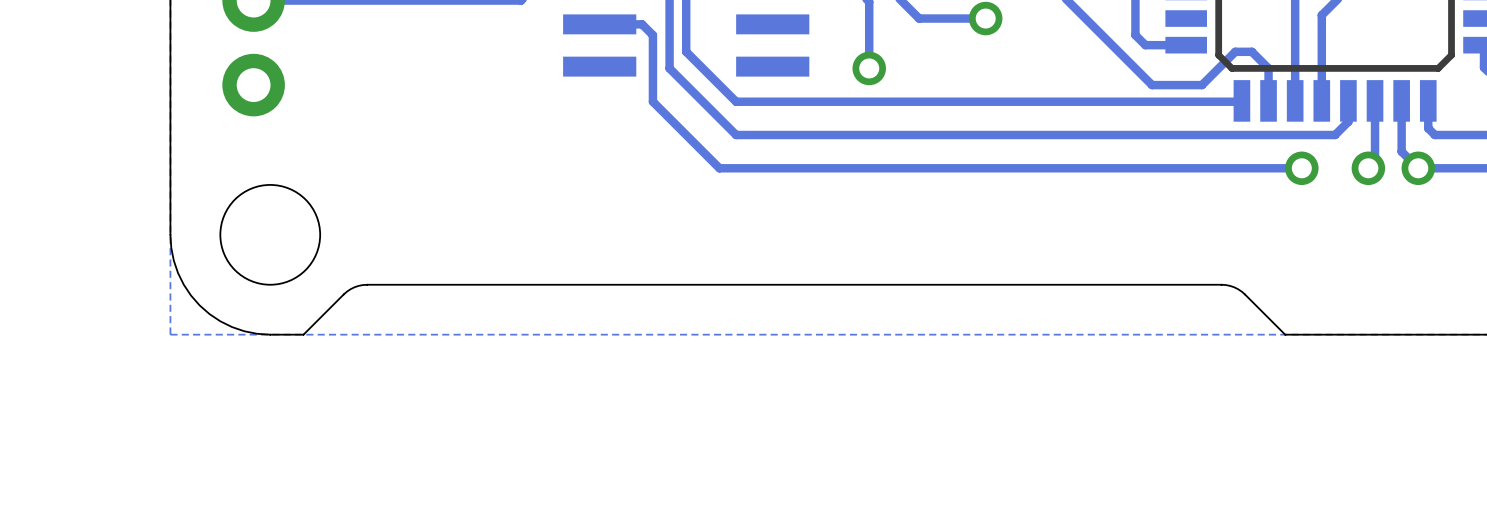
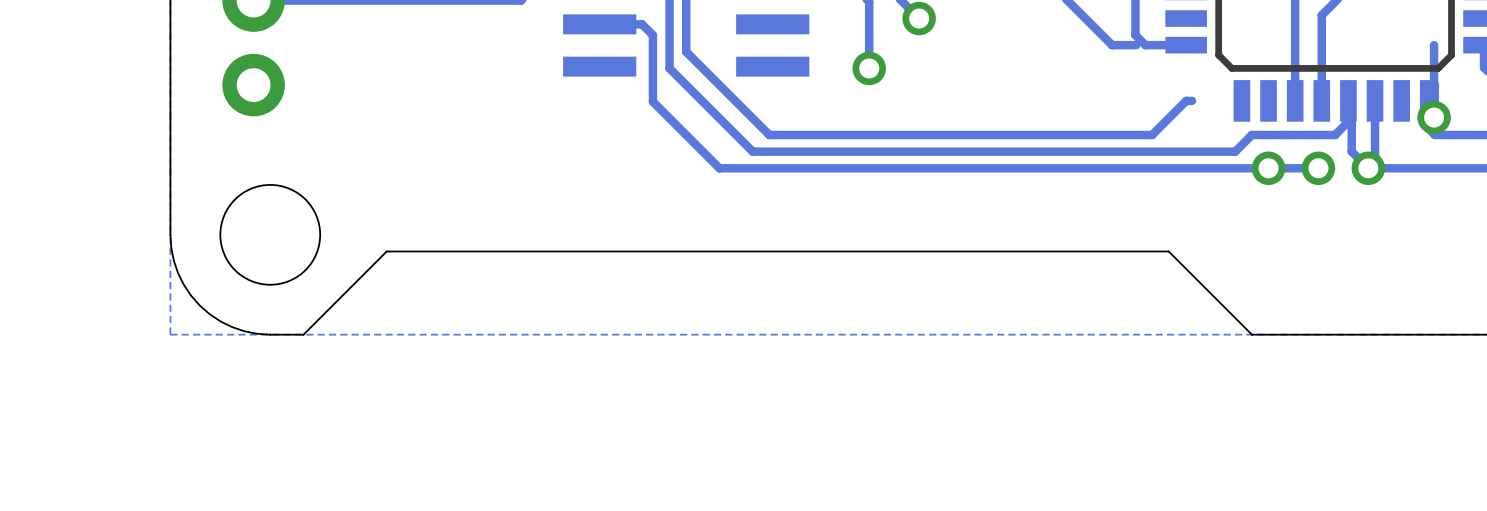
via: none -> (919, 18)
track: (985, 18) (919, 18) -> none
via: (985, 18) -> none
track: (1112, 45) (1152, 85) (1201, 85) (1235, 51) (1251, 51) (1268, 68) (1268, 100) -> (1112, 45) (1136, 45)
track: none -> (1434, 45) (1434, 117) (1434, 85)
track: (1241, 100) (736, 101) -> none
track: (1401, 100) (1401, 151) (1418, 168) -> (1351, 100) (1351, 151) (1368, 168) (1418, 168)
via: none -> (1434, 117)
track: (769, 135) (736, 135) -> (769, 135) (736, 101)
track: (1251, 135) (1152, 135) -> (1192, 100) (1186, 100) (1152, 135)
track: none -> (1251, 135) (1235, 151) (752, 151) (736, 135)
via: none -> (1268, 168)
via: (1301, 168) -> none
via: none -> (1318, 168)
via: (1418, 168) -> none
board edge: (343, 294) (354, 287) (367, 284) (1221, 284) (1234, 287) (1241, 291) (1285, 334) -> (343, 294) (386, 251) (1168, 251) (1251, 334) (1285, 334)

